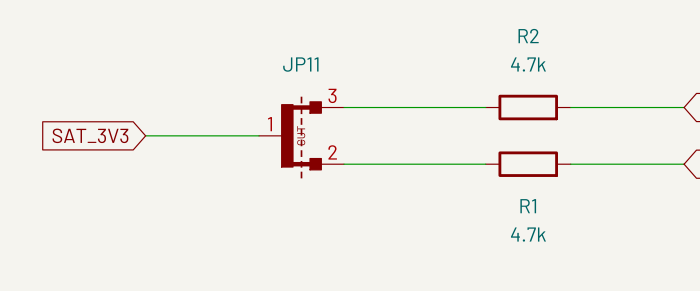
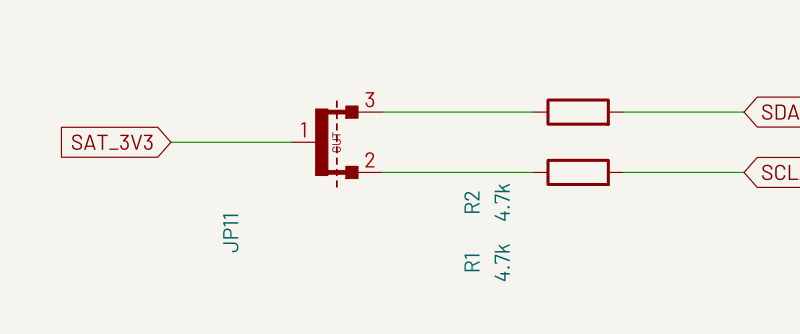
R2 name rotation: 0° (528, 36) -> 90° counterclockwise (471, 202)
R2 name position: R2 (528, 36) -> R2 (471, 202)
JP11 name rotation: 0° (300, 64) -> 90° counterclockwise (230, 233)
JP11 name position: JP11 (300, 64) -> JP11 (230, 233)
R2 value rotation: 0° (528, 64) -> 90° counterclockwise (502, 202)
R2 value position: 4.7k (528, 64) -> 4.7k (502, 202)
R1 name rotation: 0° (528, 206) -> 90° counterclockwise (472, 262)
R1 name position: R1 (528, 206) -> R1 (472, 262)
R1 value rotation: 0° (528, 234) -> 90° counterclockwise (502, 262)
R1 value position: 4.7k (528, 234) -> 4.7k (502, 262)

